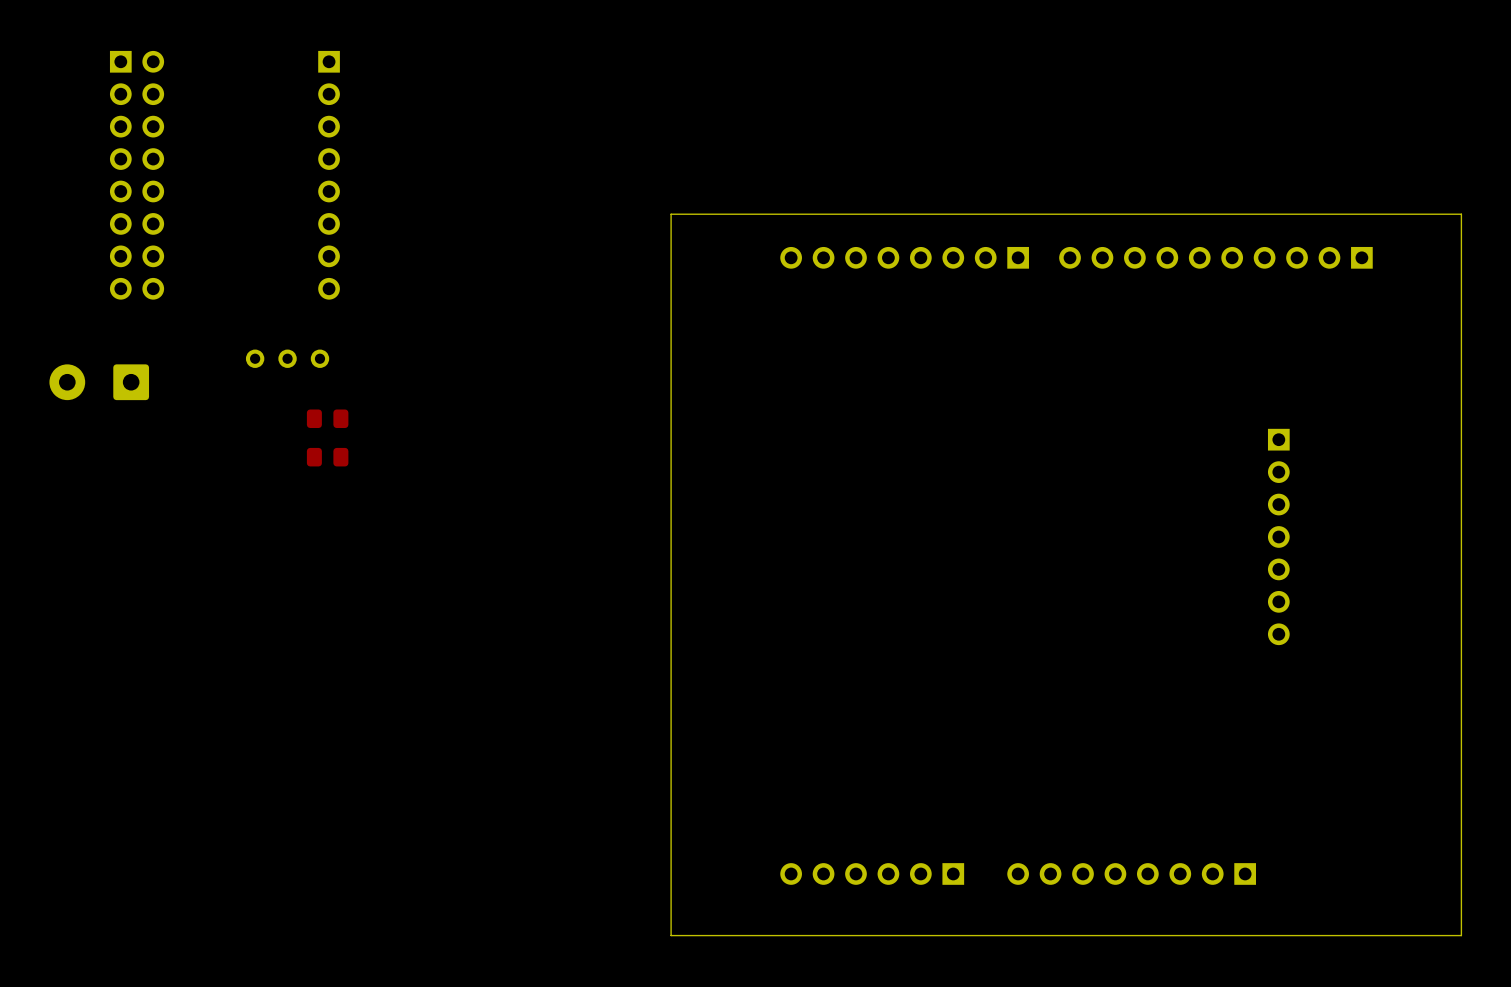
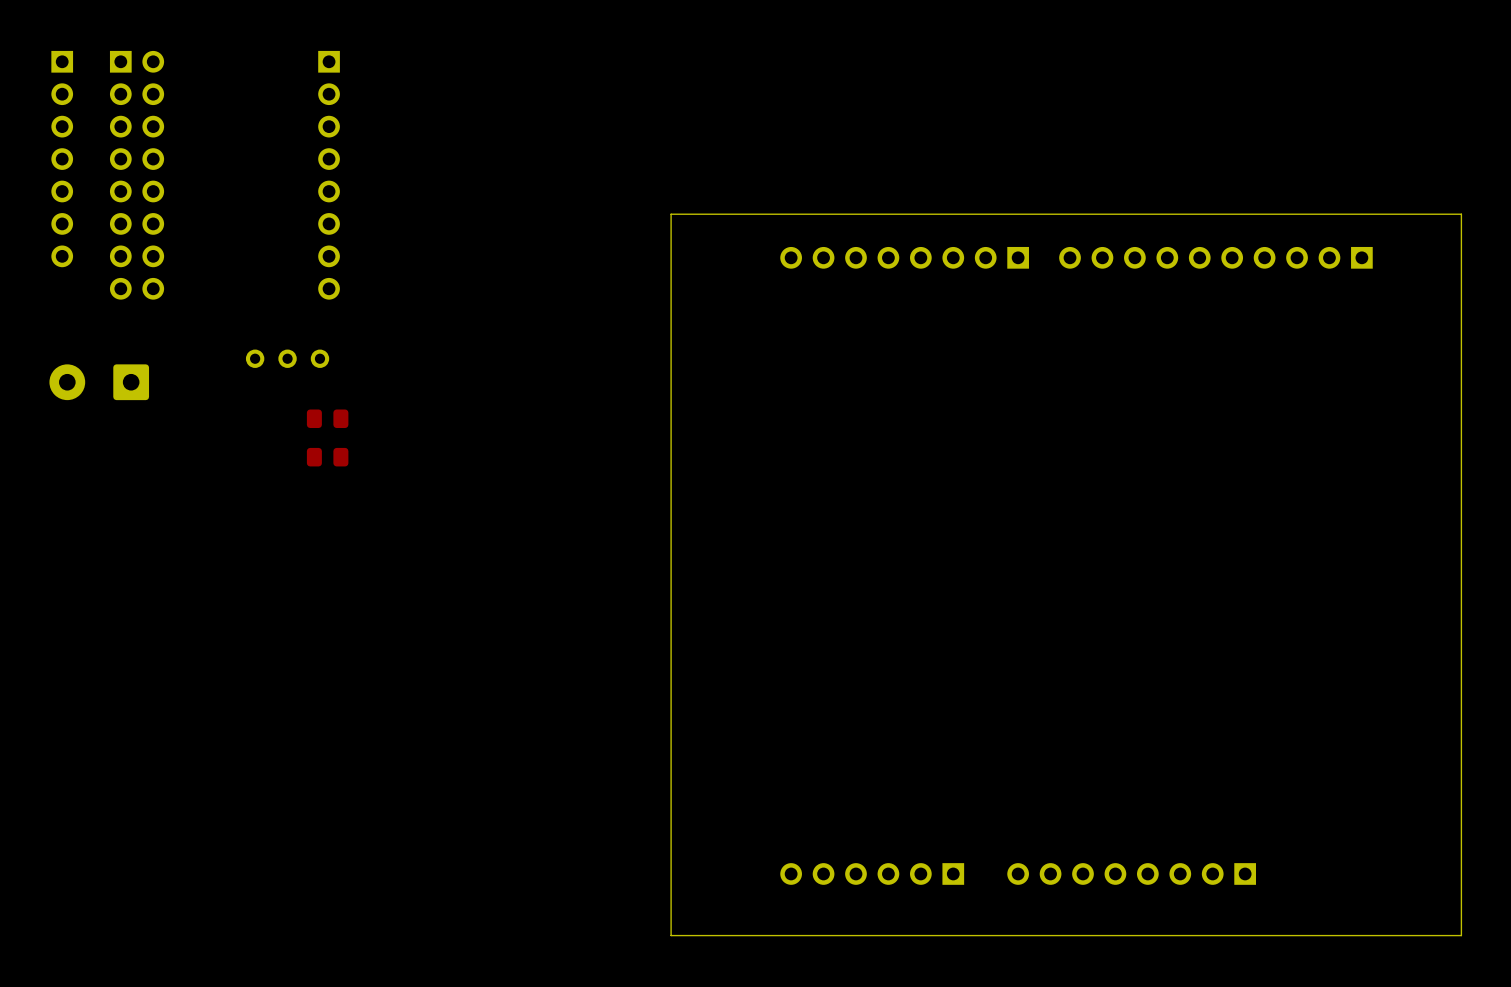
part: none -> (62, 159)
part: (1278, 536) -> none

